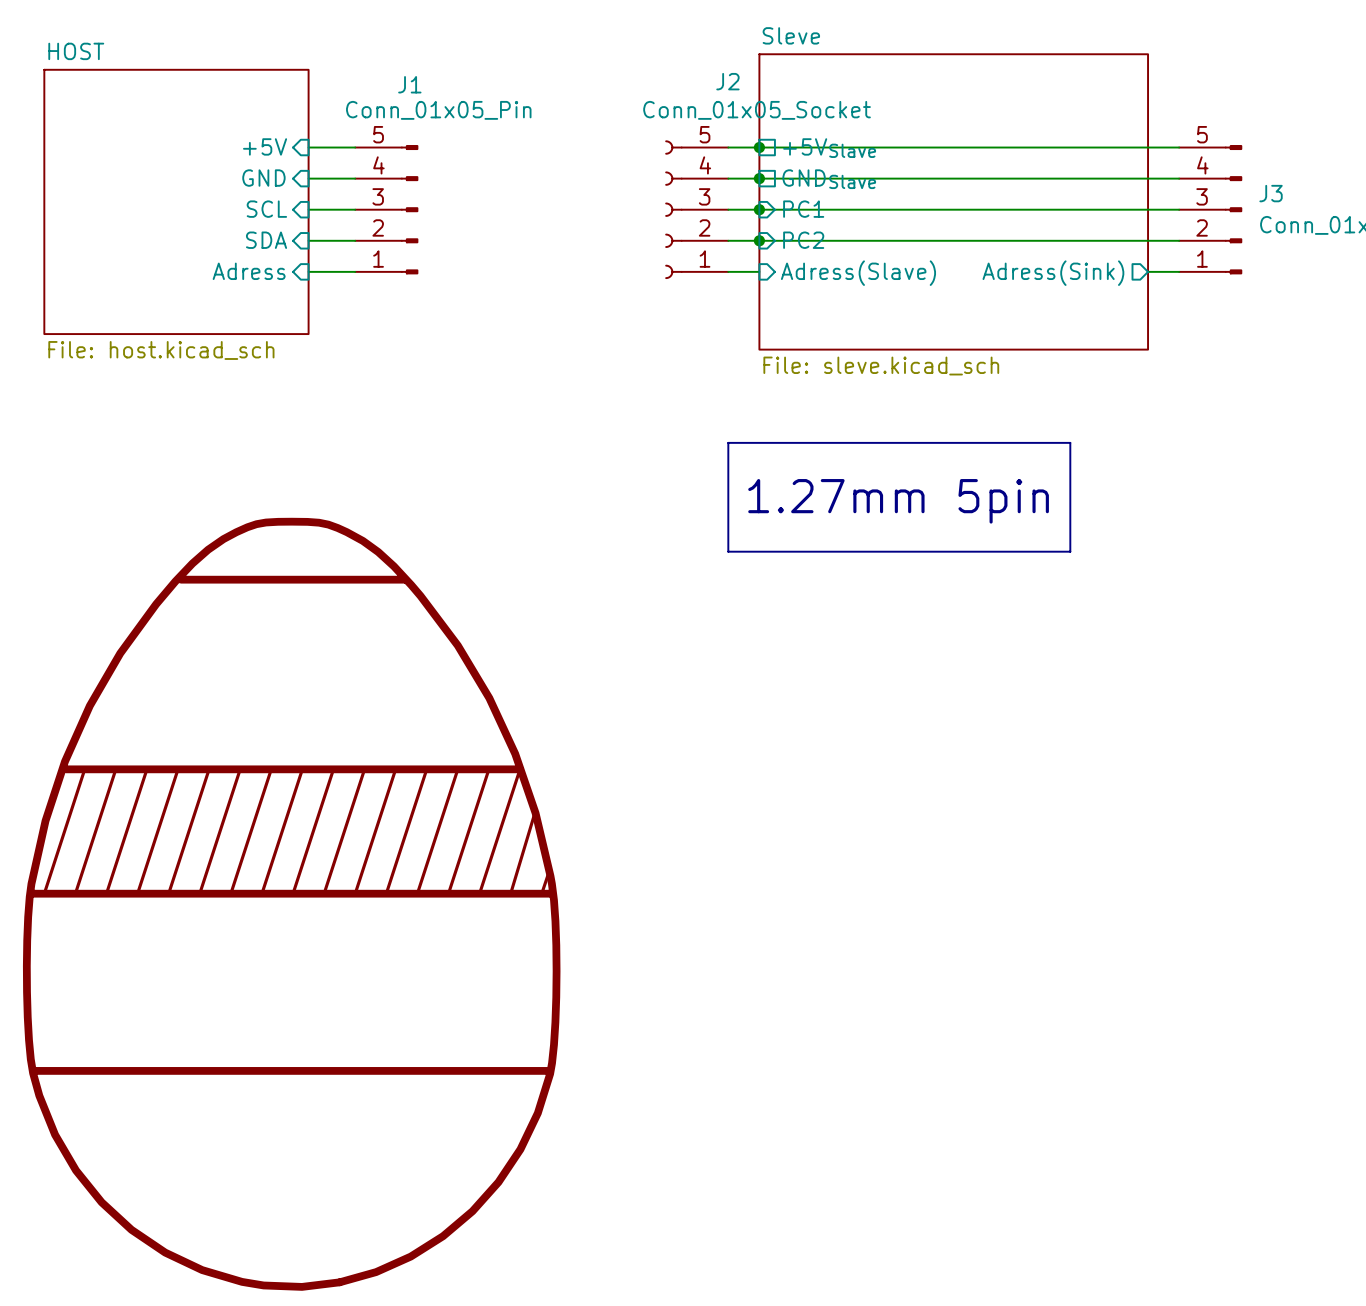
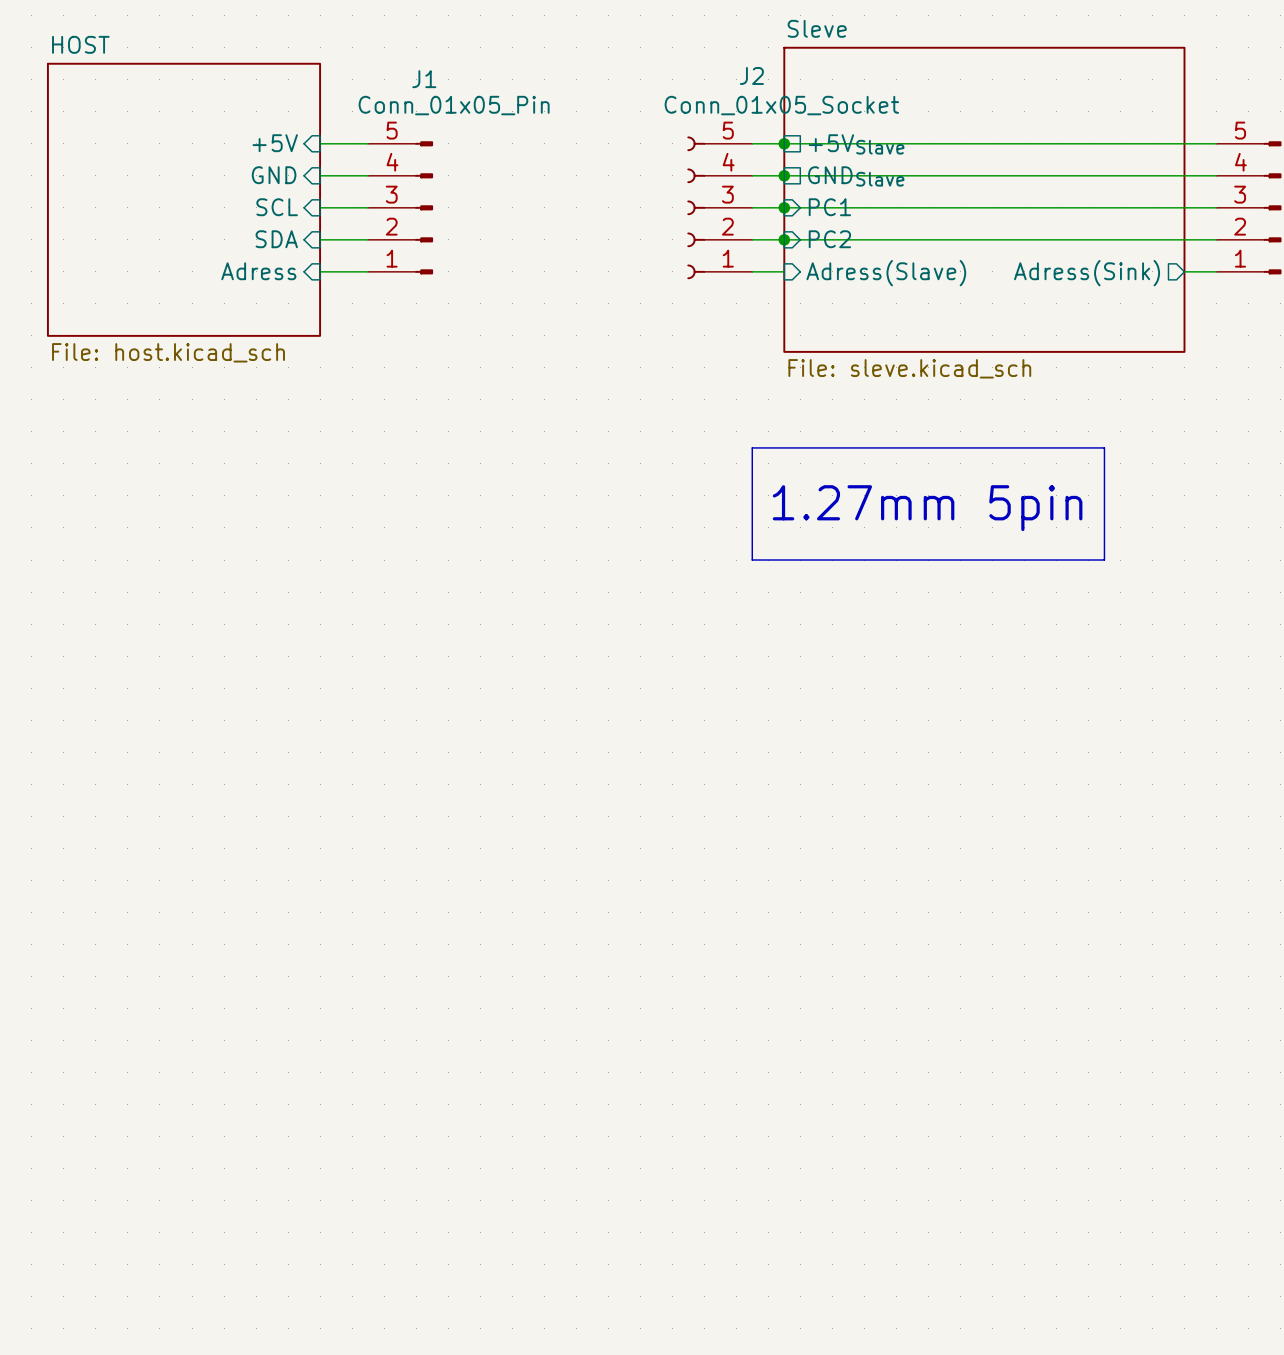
part: (291, 904) -> none

